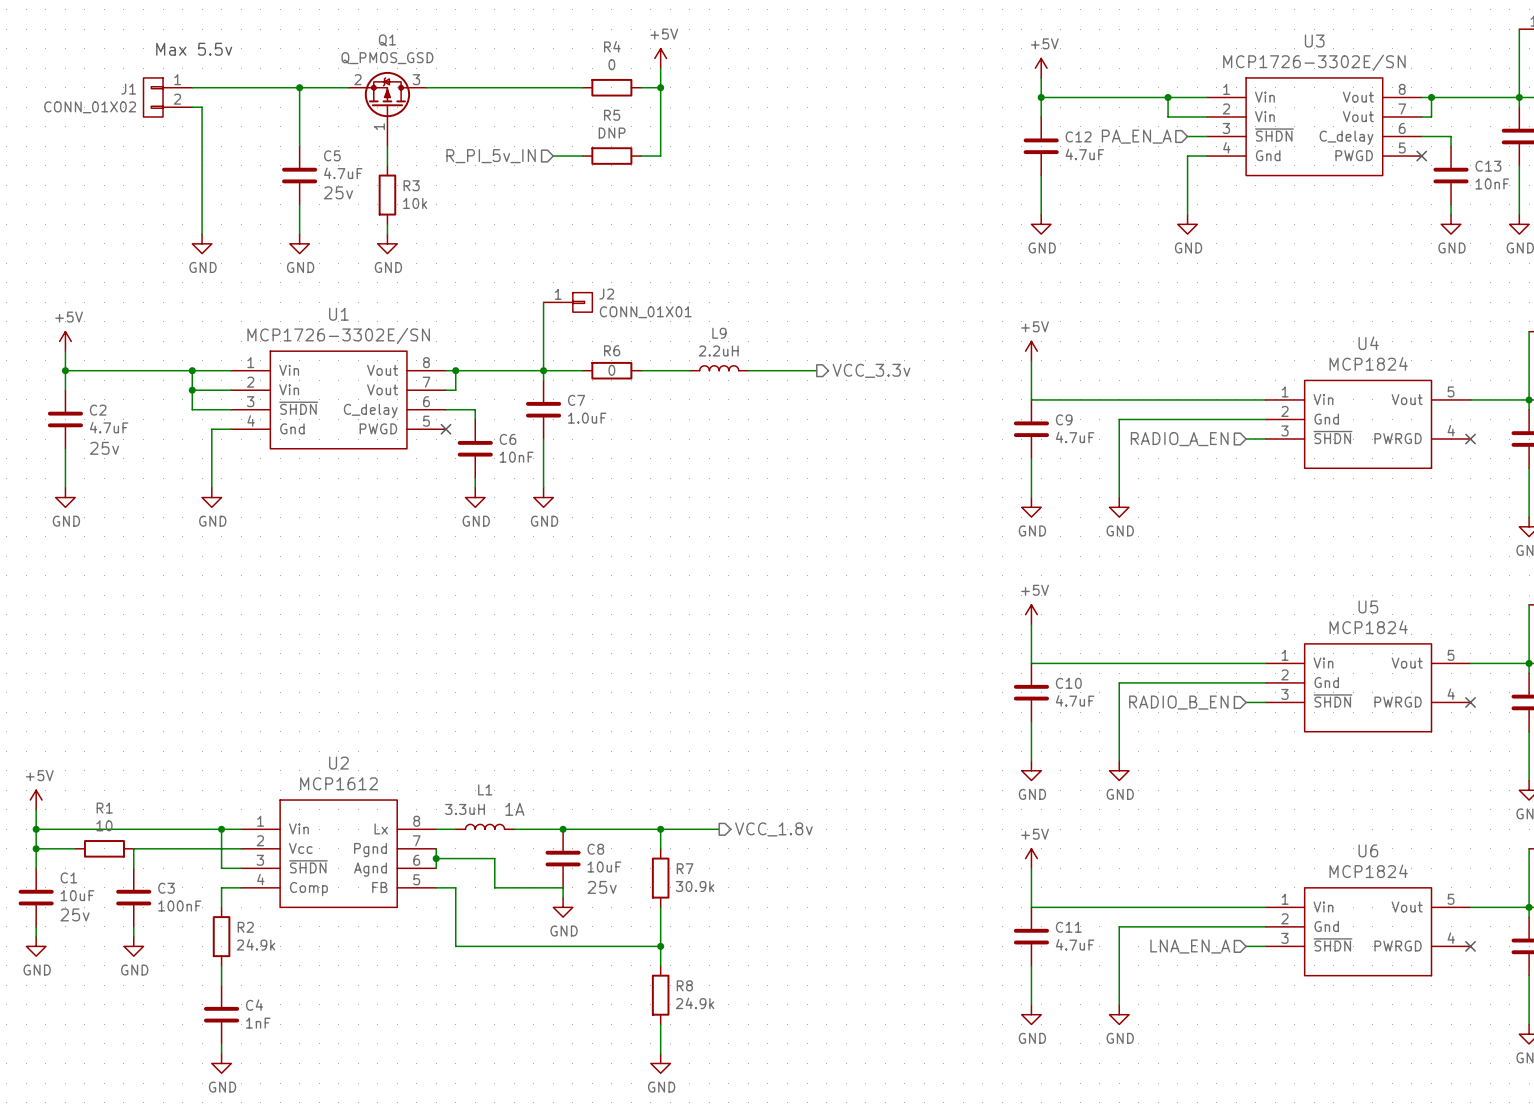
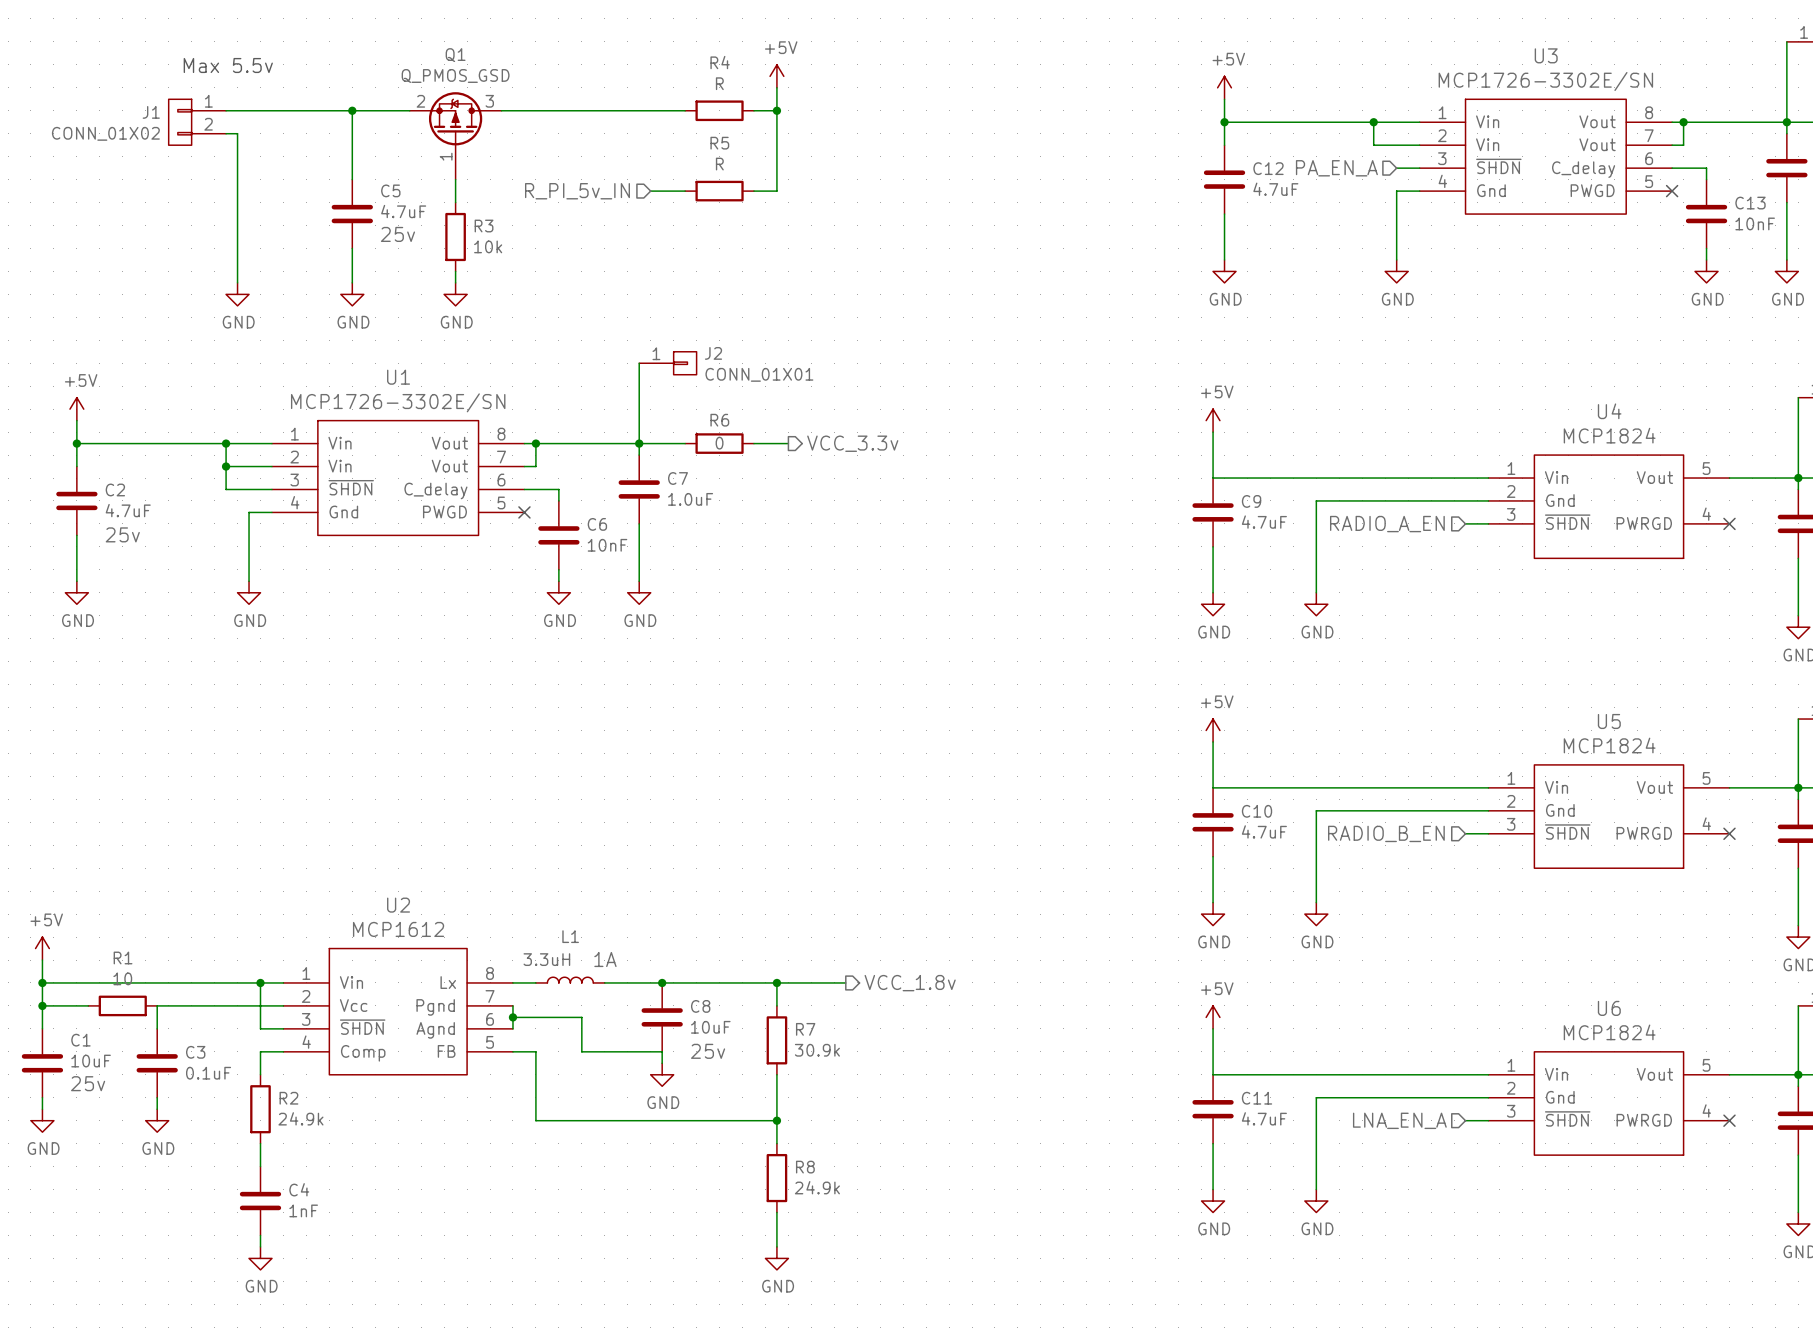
R4 value: 0 (611, 64) -> R (719, 83)
R5 value: DNP (612, 133) -> R (719, 164)
L9: 2.2uH (719, 368) -> none
wire: (670, 370) (689, 370) -> none
wire: (748, 370) (816, 370) -> none
hierarchical label position: VCC_3.3v (871, 370) -> VCC_3.3v (852, 443)
C3 value: 100nF (179, 906) -> 0.1uF (208, 1073)

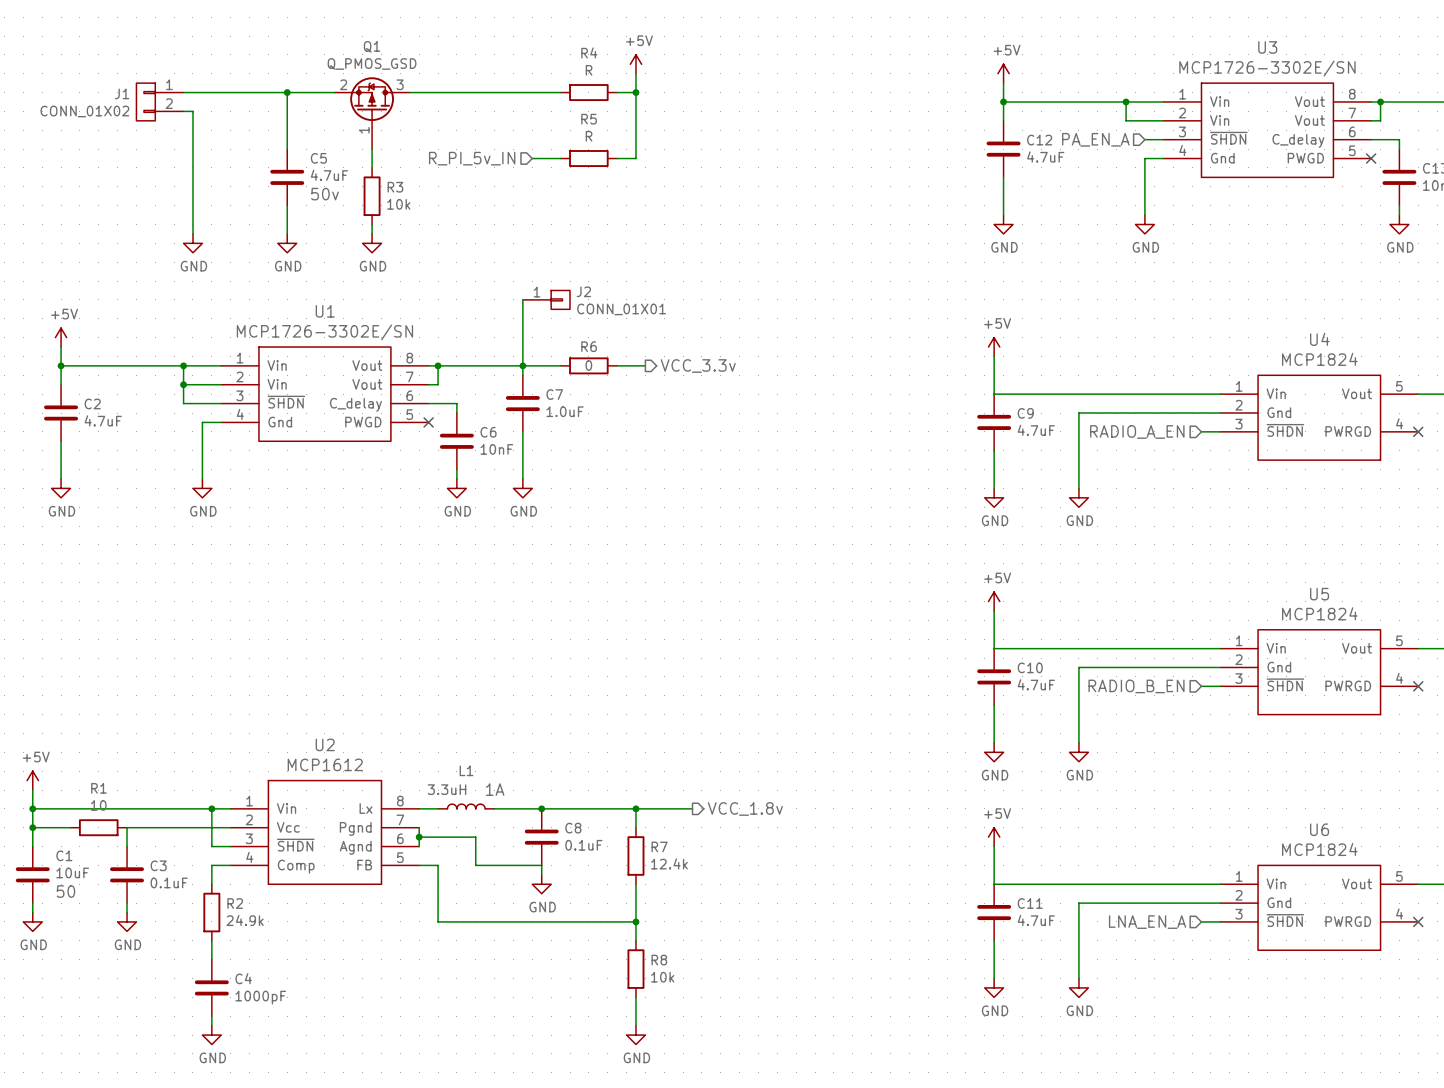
text: Max 5.5v (228, 65) -> none
C5 text: 25v (397, 234) -> 50v (325, 194)
C2 text: 25v (122, 534) -> none
C8 value: 10uF (710, 1027) -> 0.1uF (583, 845)
R7 value: 30.9k (817, 1050) -> 12.4k (669, 863)
C8 text: 25v (708, 1051) -> none
C1 text: 25v (88, 1083) -> 50 (65, 891)
R8 value: 24.9k (817, 1187) -> 10k (662, 977)
C4 value: 1nF (303, 1210) -> 1000pF (260, 997)

